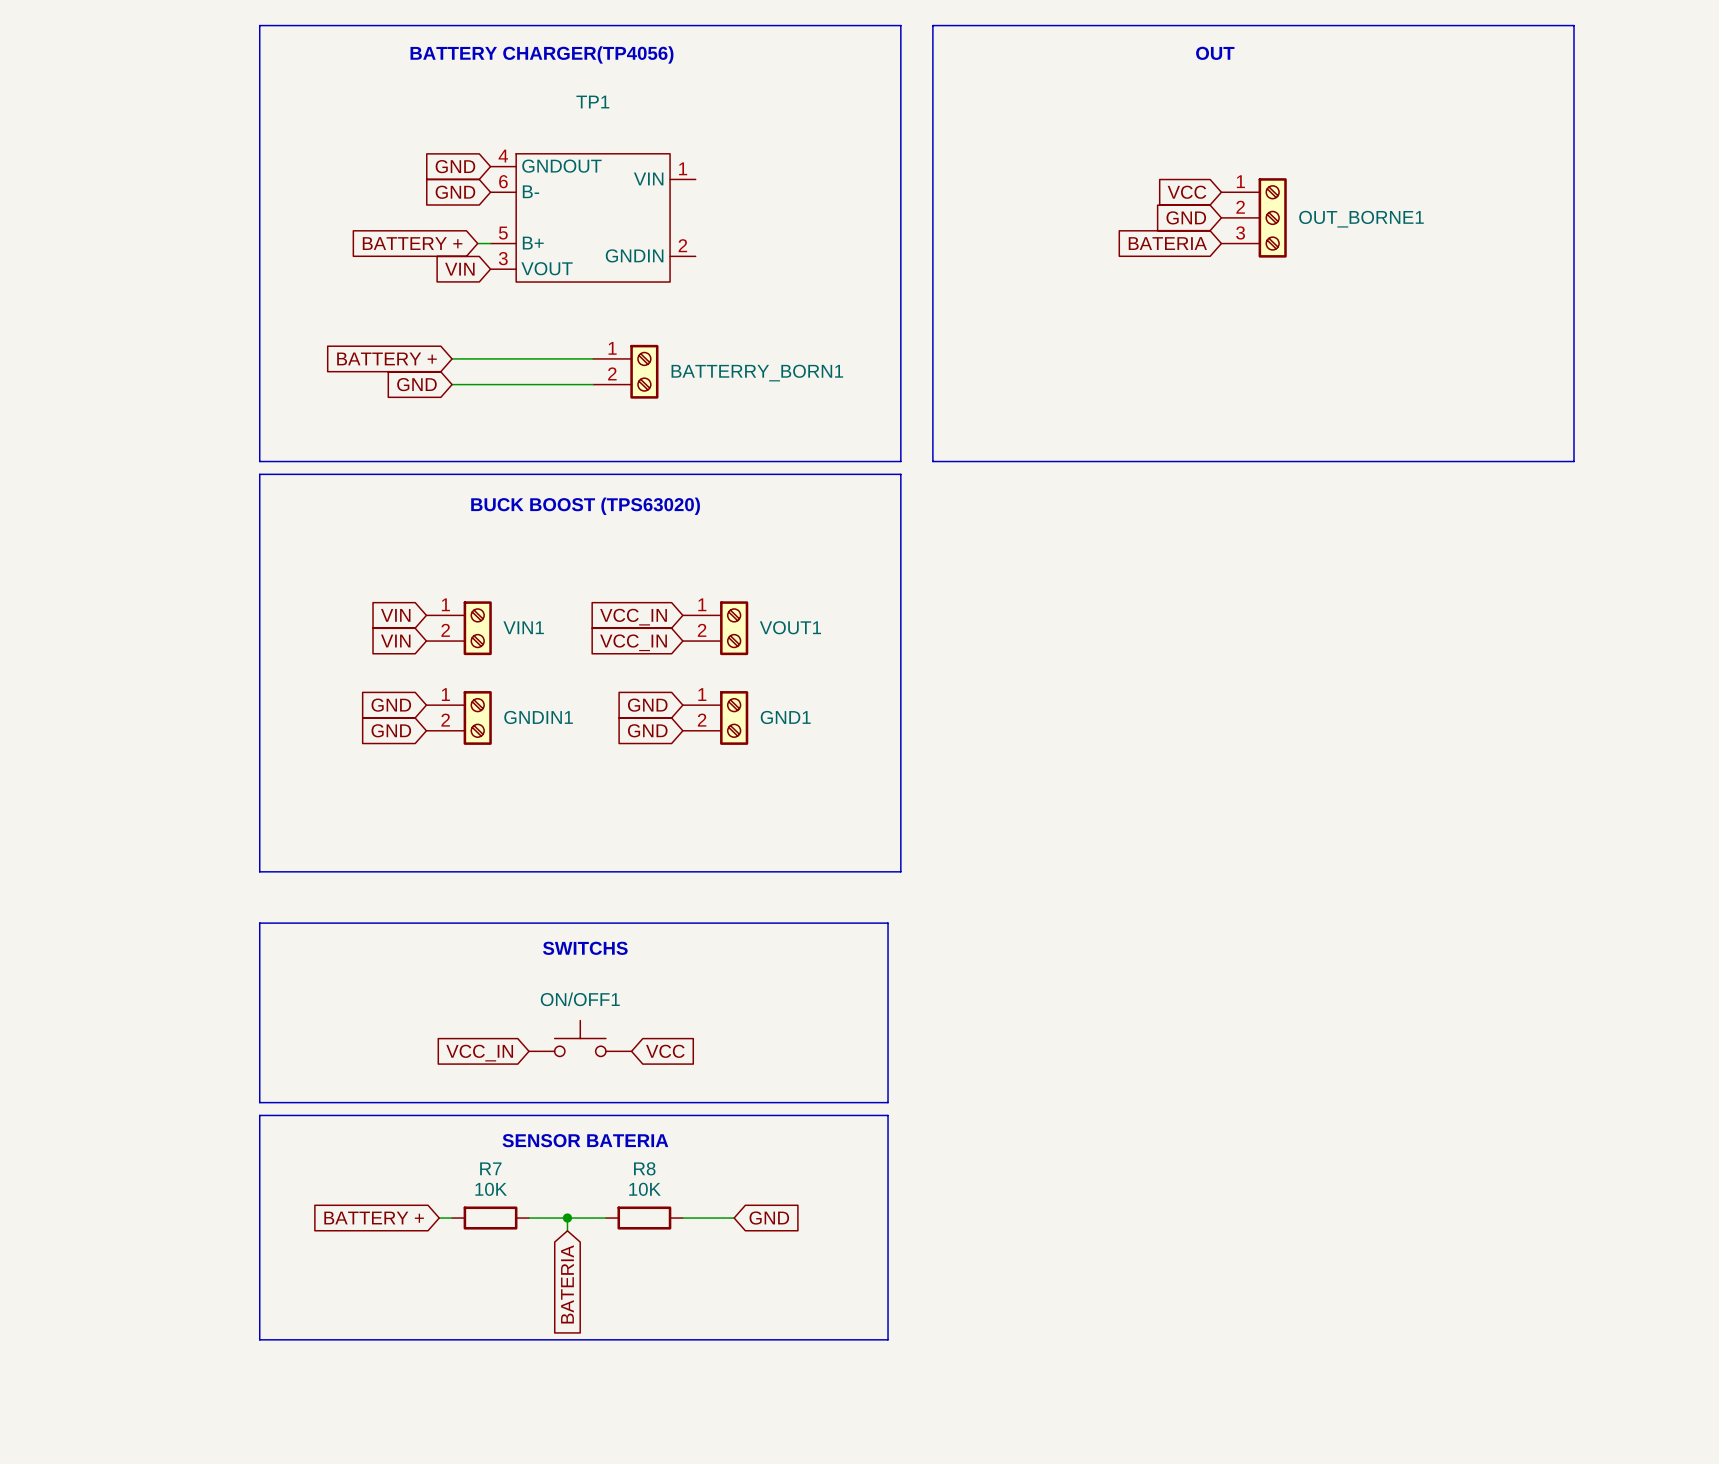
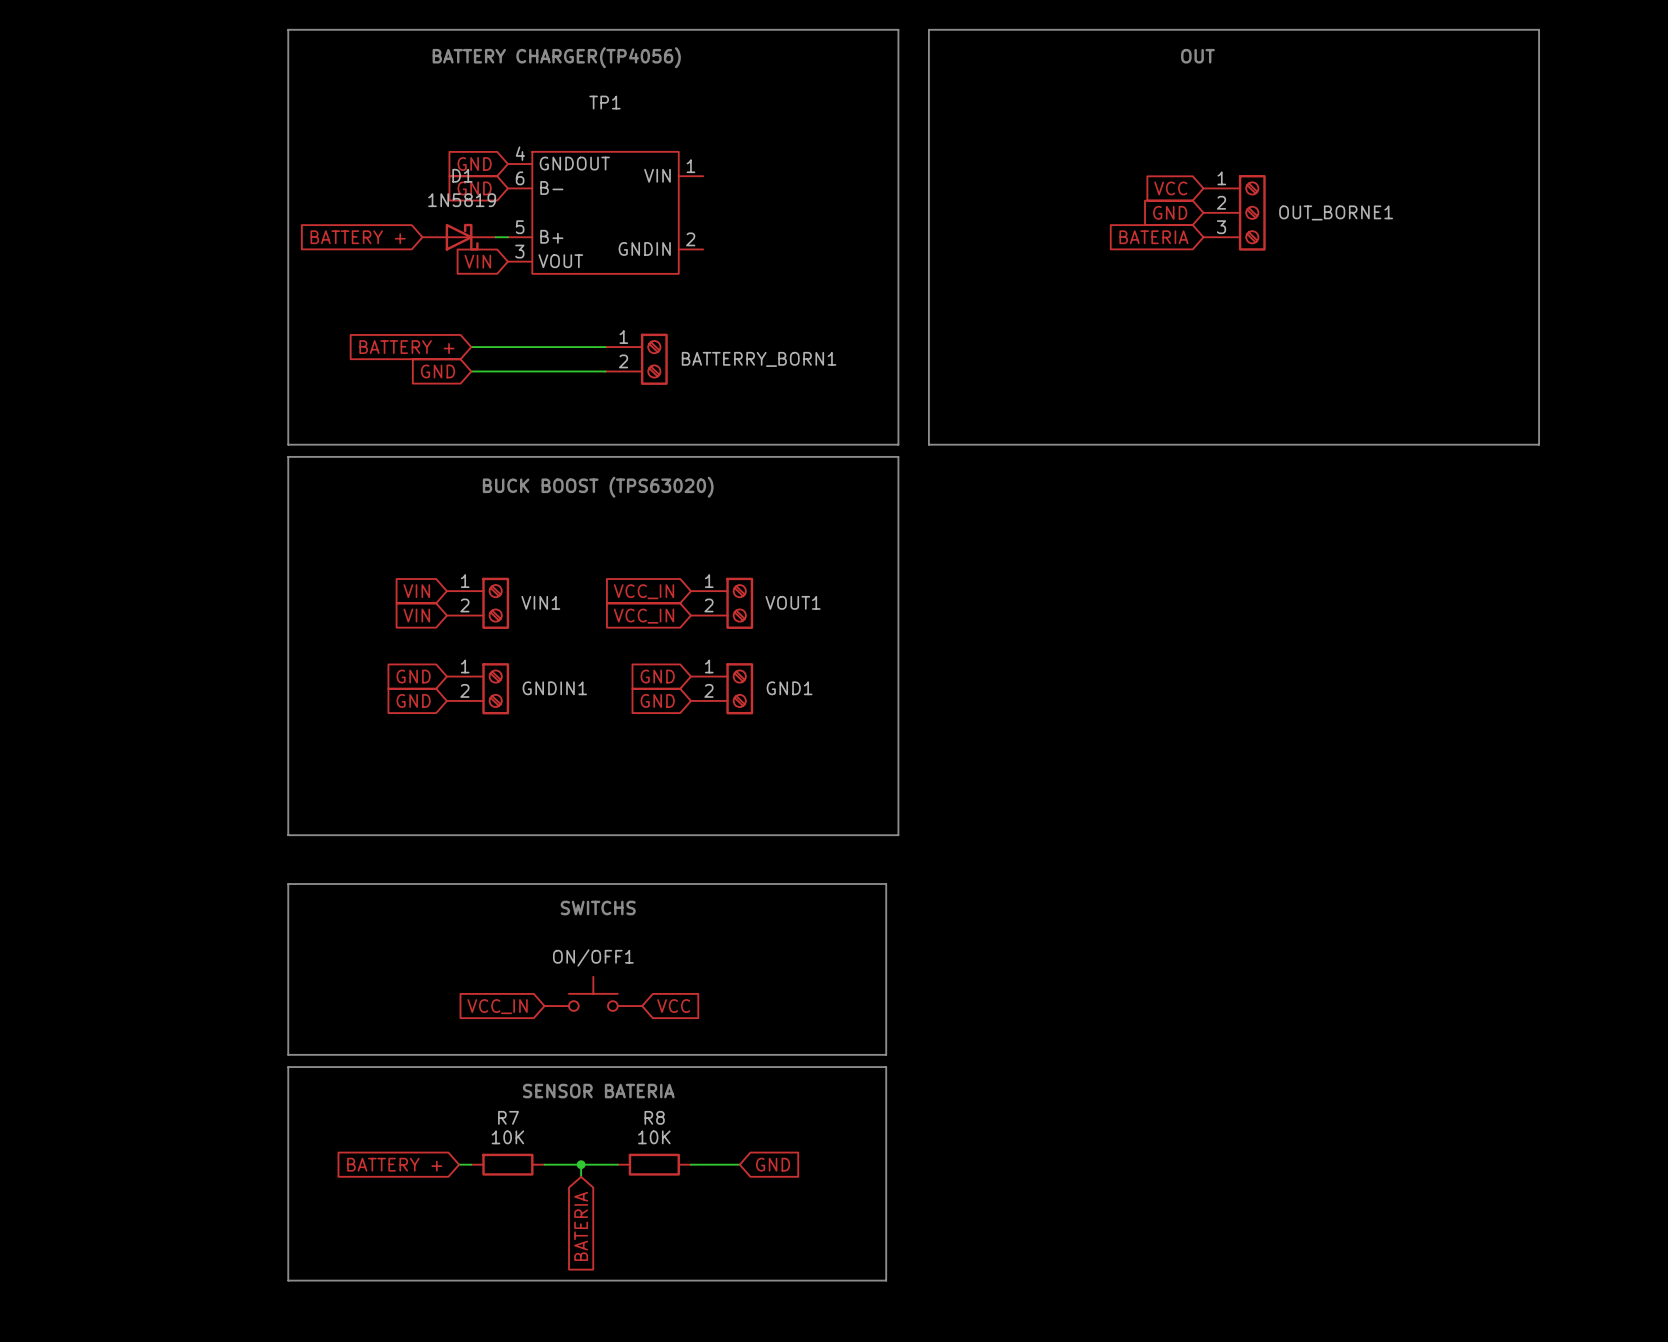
global label position: BATTERY + (412, 243) -> BATTERY + (358, 237)
D1: none -> 1N5819 (459, 237)

